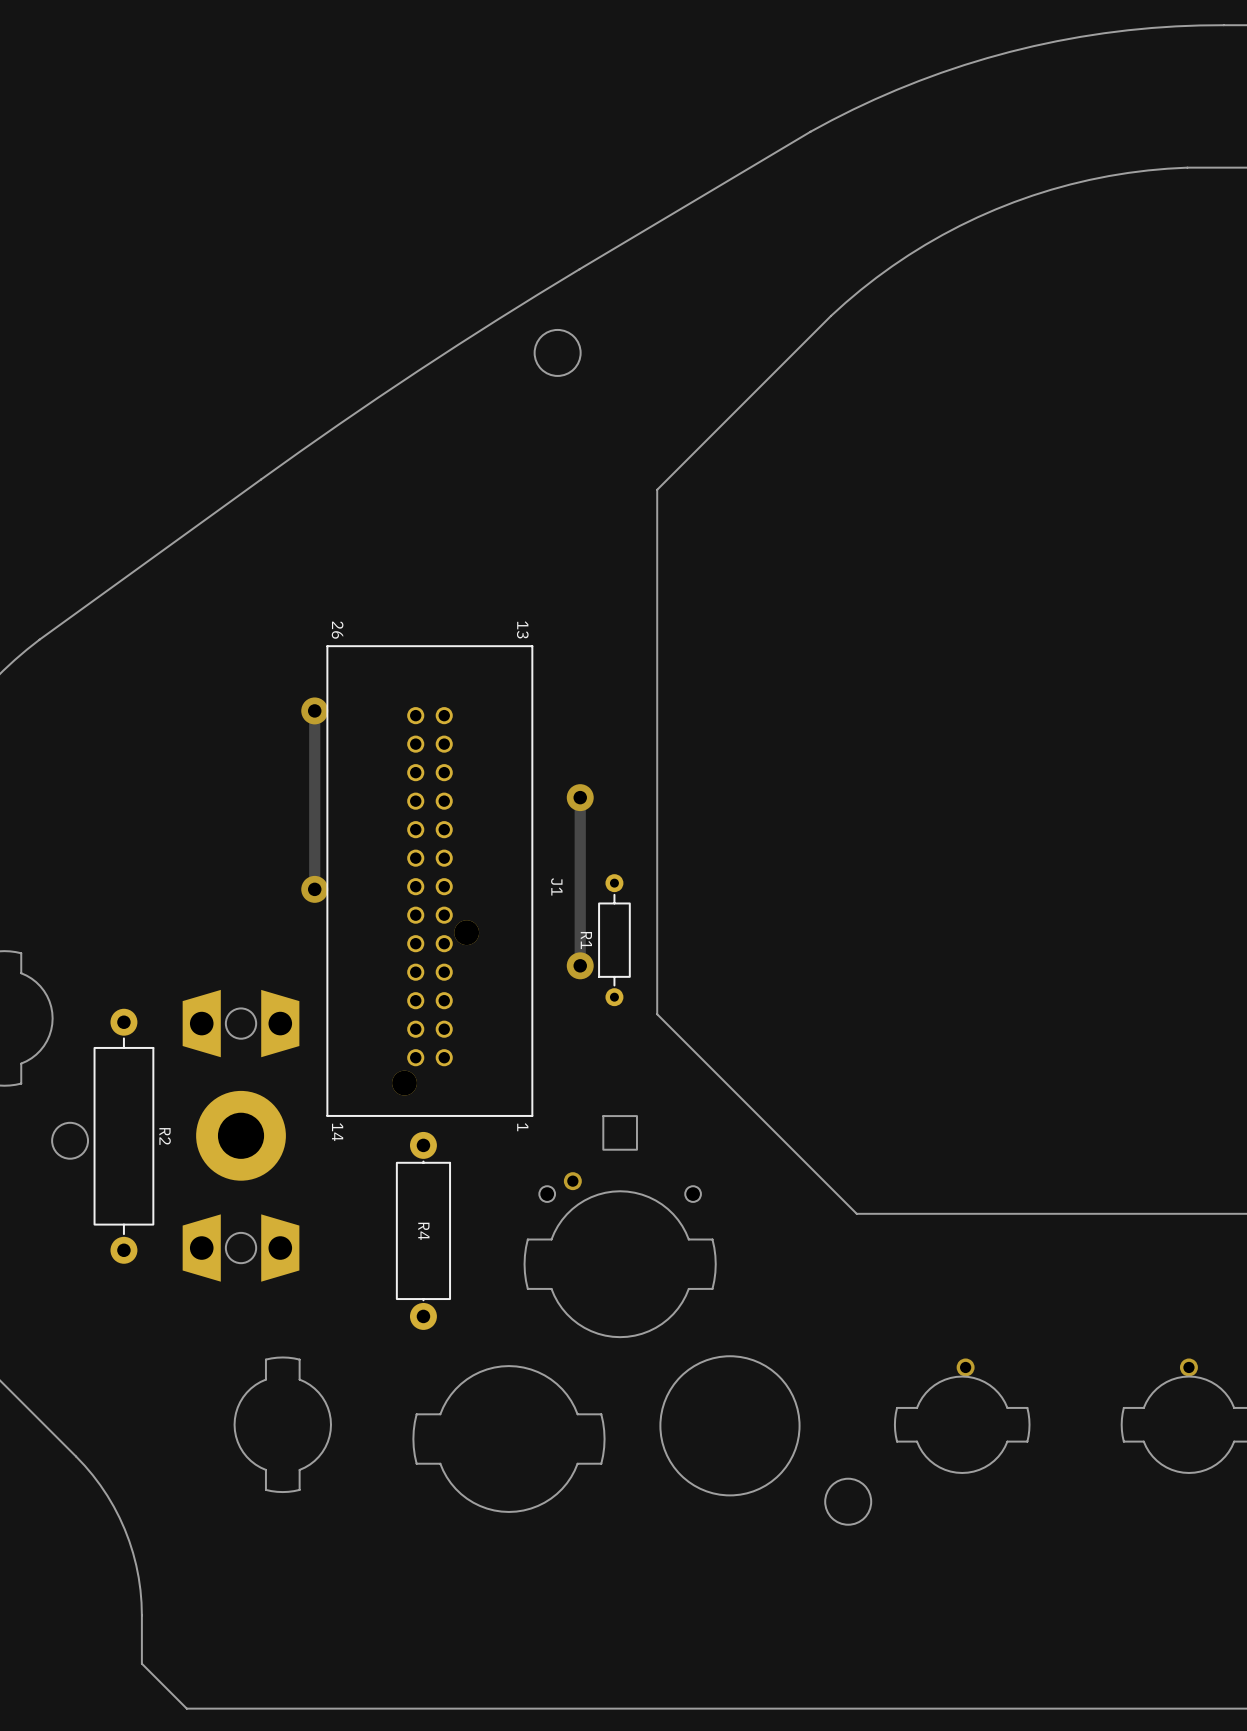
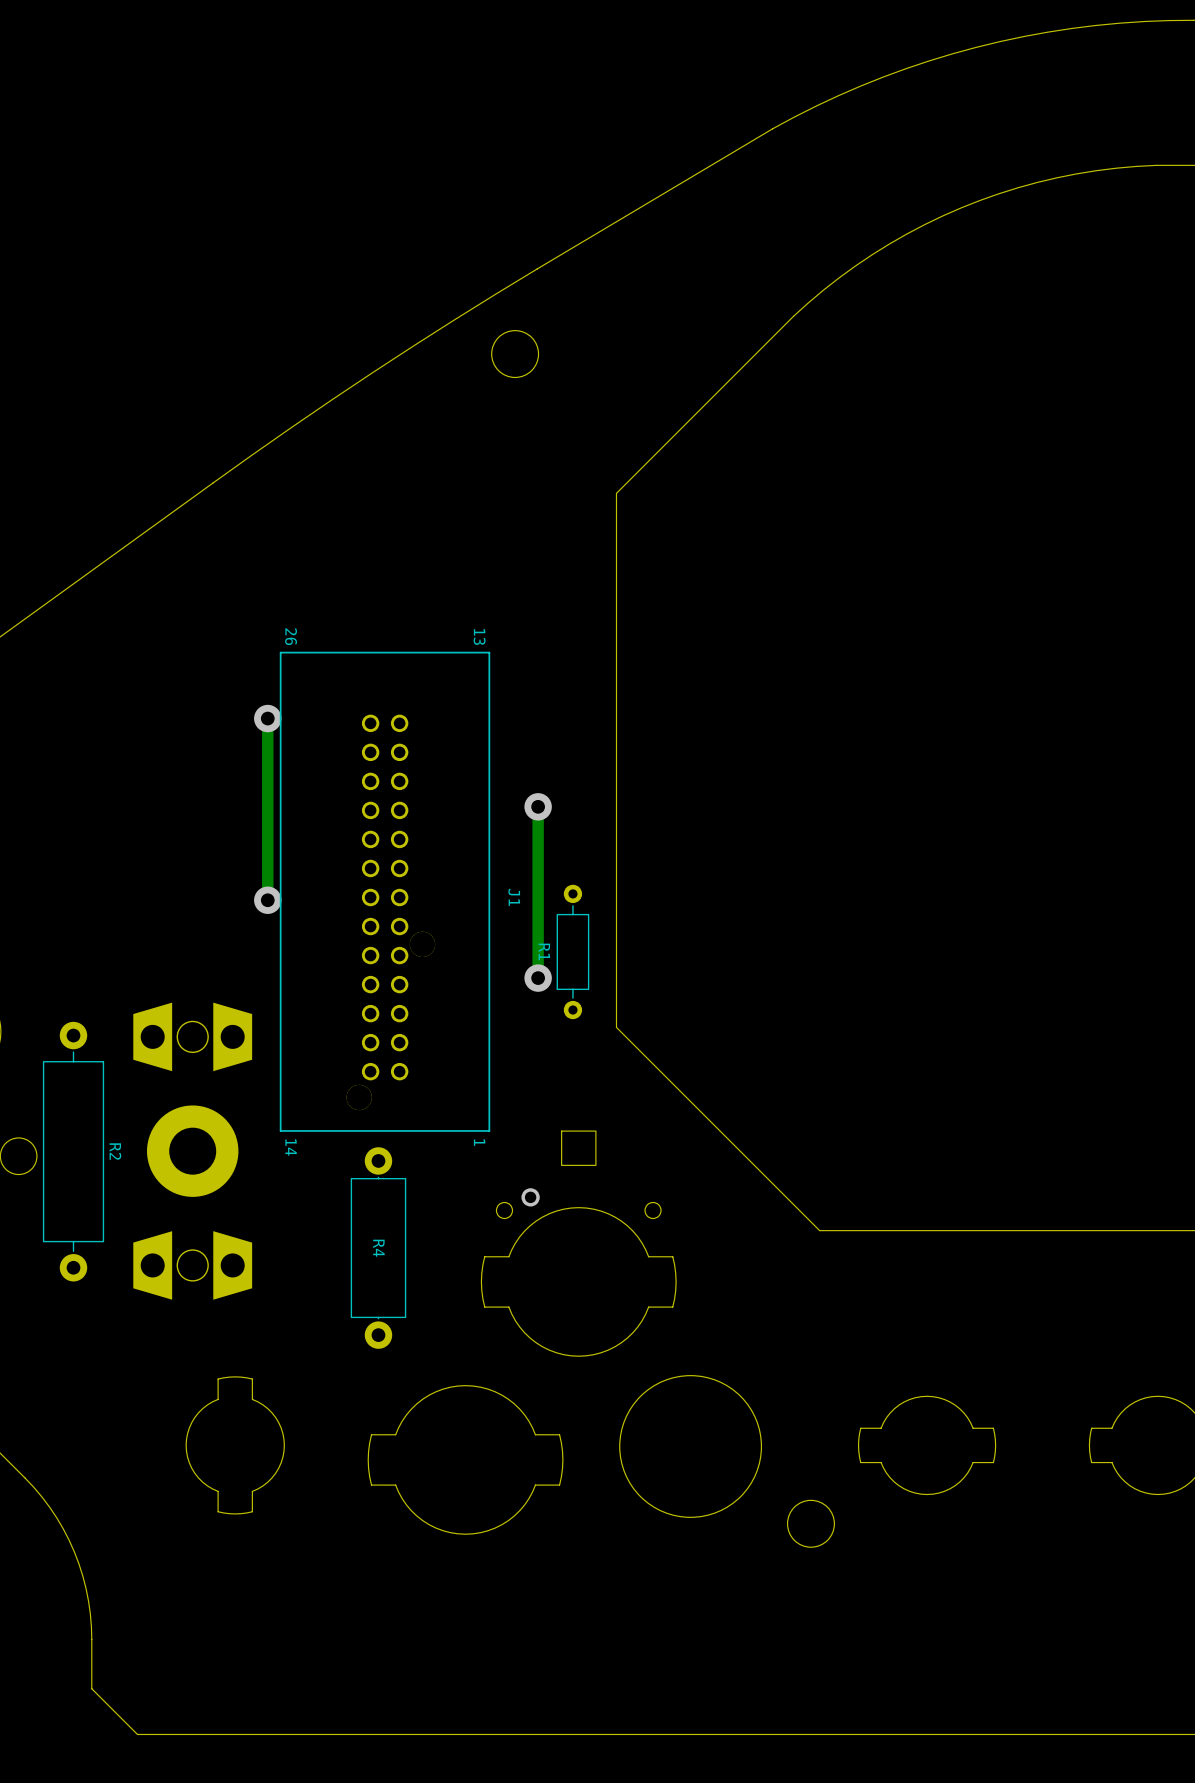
via: (965, 1367) -> none
via: (1188, 1367) -> none

